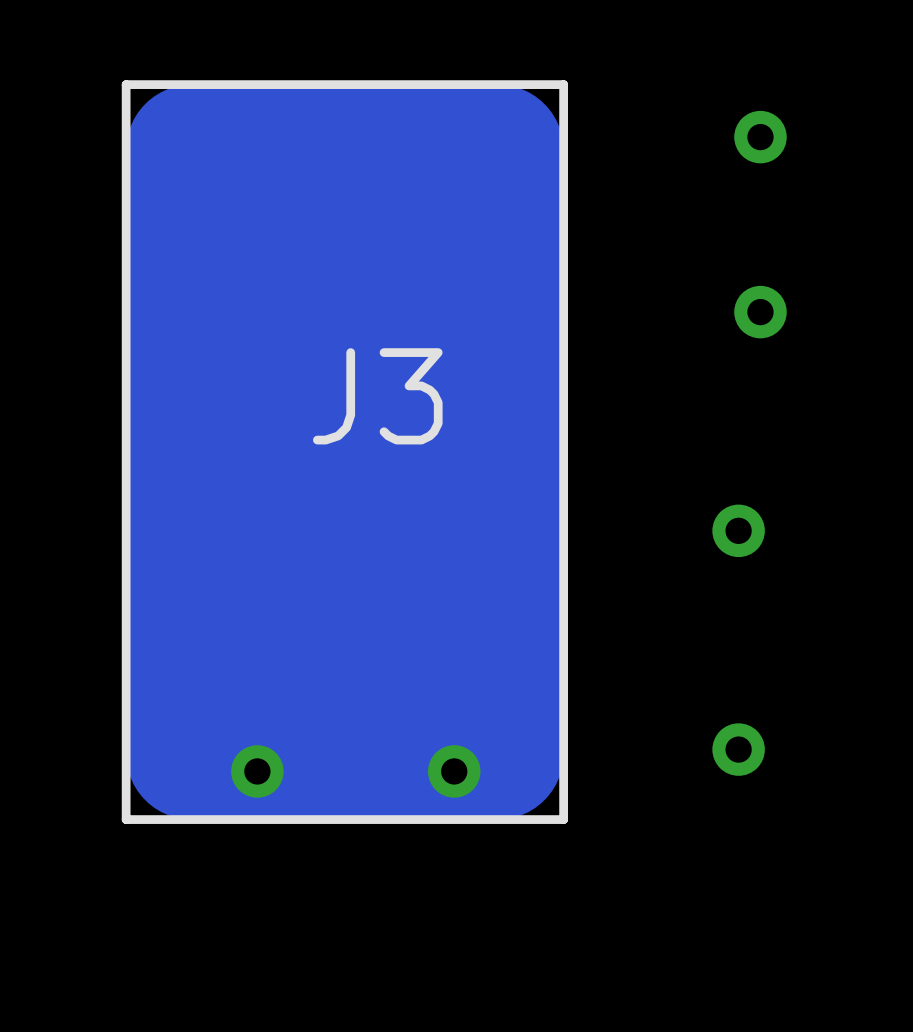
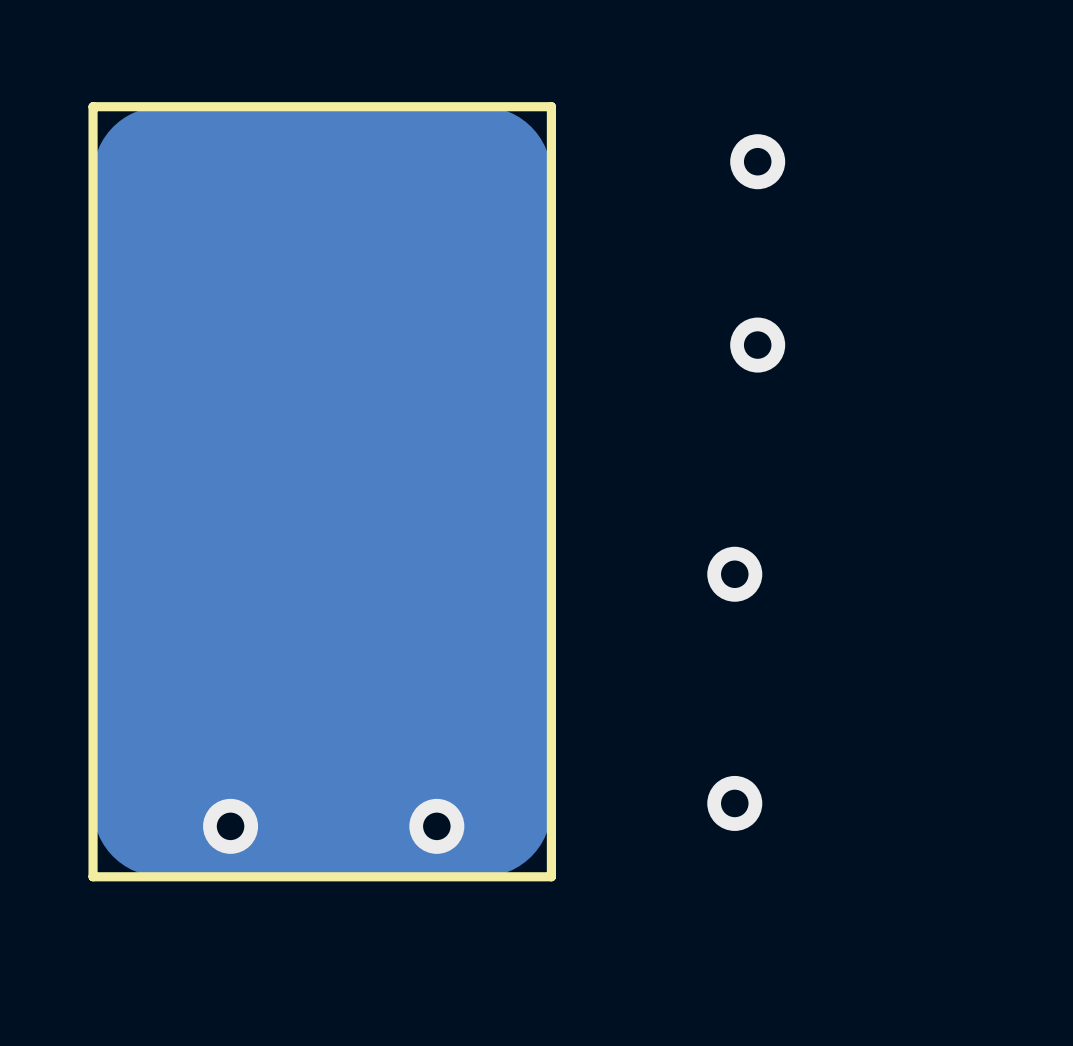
J3 name: J3 (377, 396) -> none

